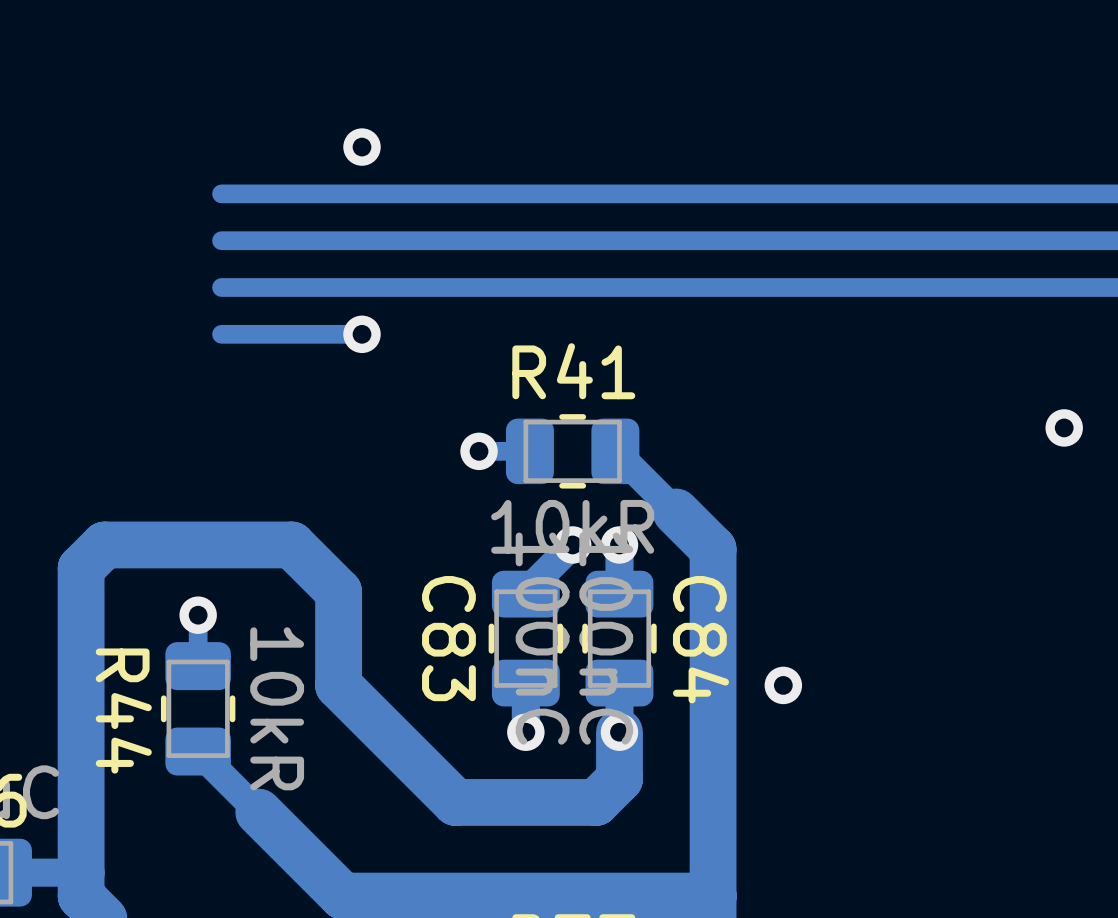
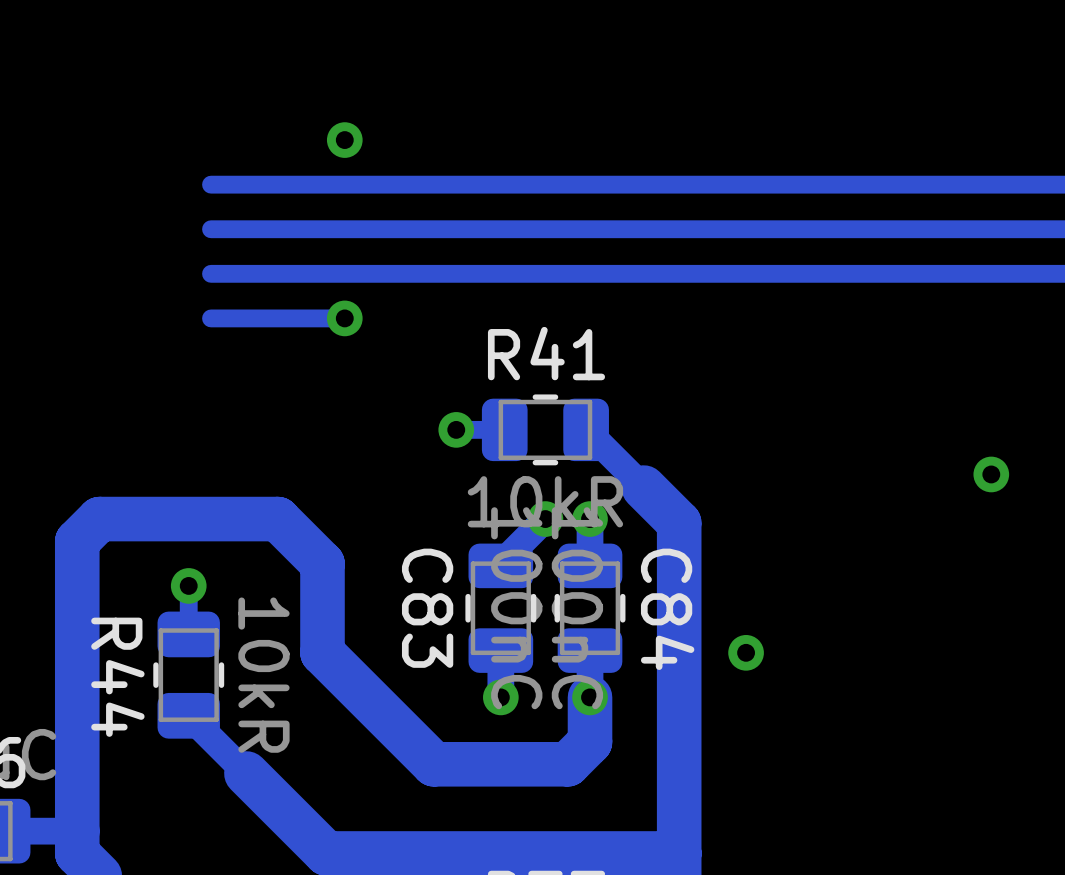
via: (1064, 427) -> none
via: none -> (991, 474)

